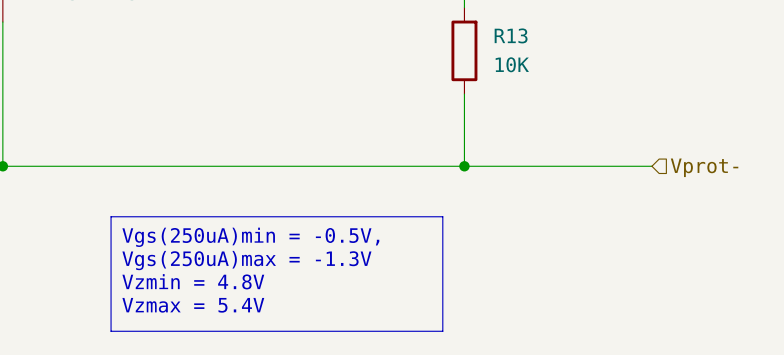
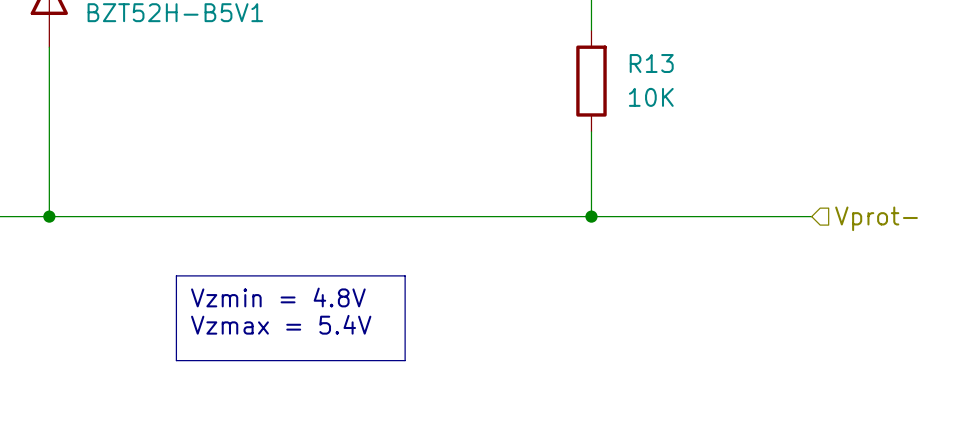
line: (305, 216) (442, 216) (442, 331) (111, 331) (111, 288) -> (405, 275) (405, 360) (176, 360)
text: Vgs(250uA)min = -0.5V, (250, 237) -> Vzmin = 4.8V (278, 297)
text: Vgs(250uA)max = -1.3V (246, 260) -> Vzmax = 5.4V (281, 324)
text: Vzmin = 4.8V (193, 281) -> none
text: Vzmax = 5.4V (193, 305) -> none

